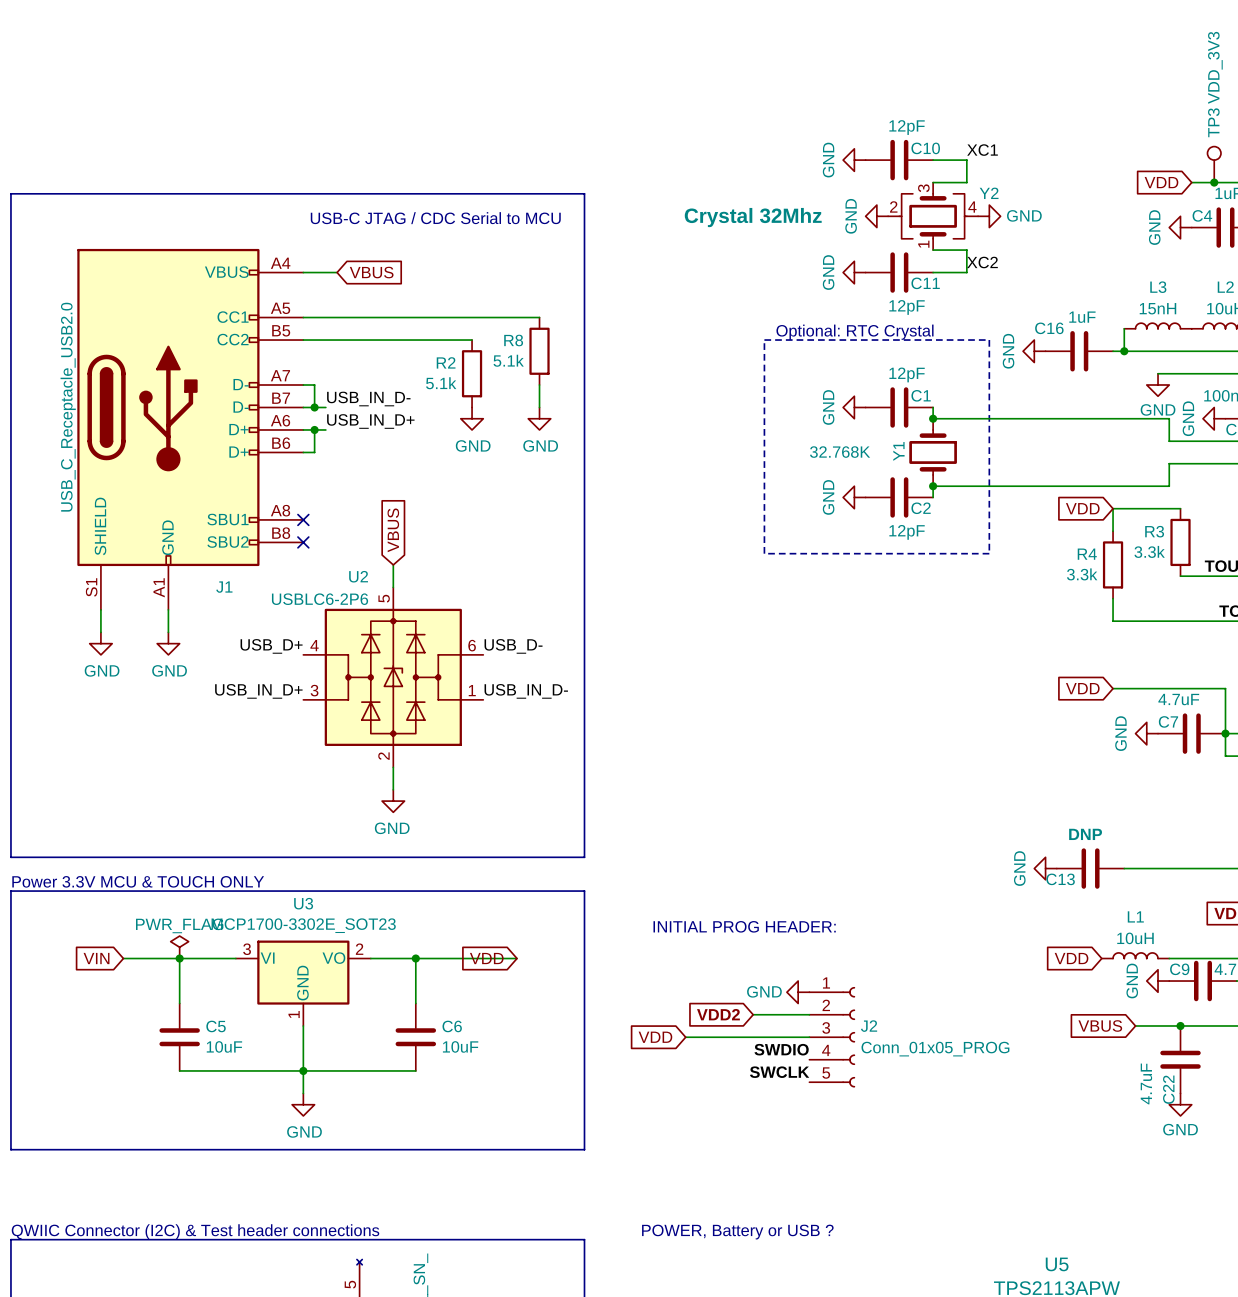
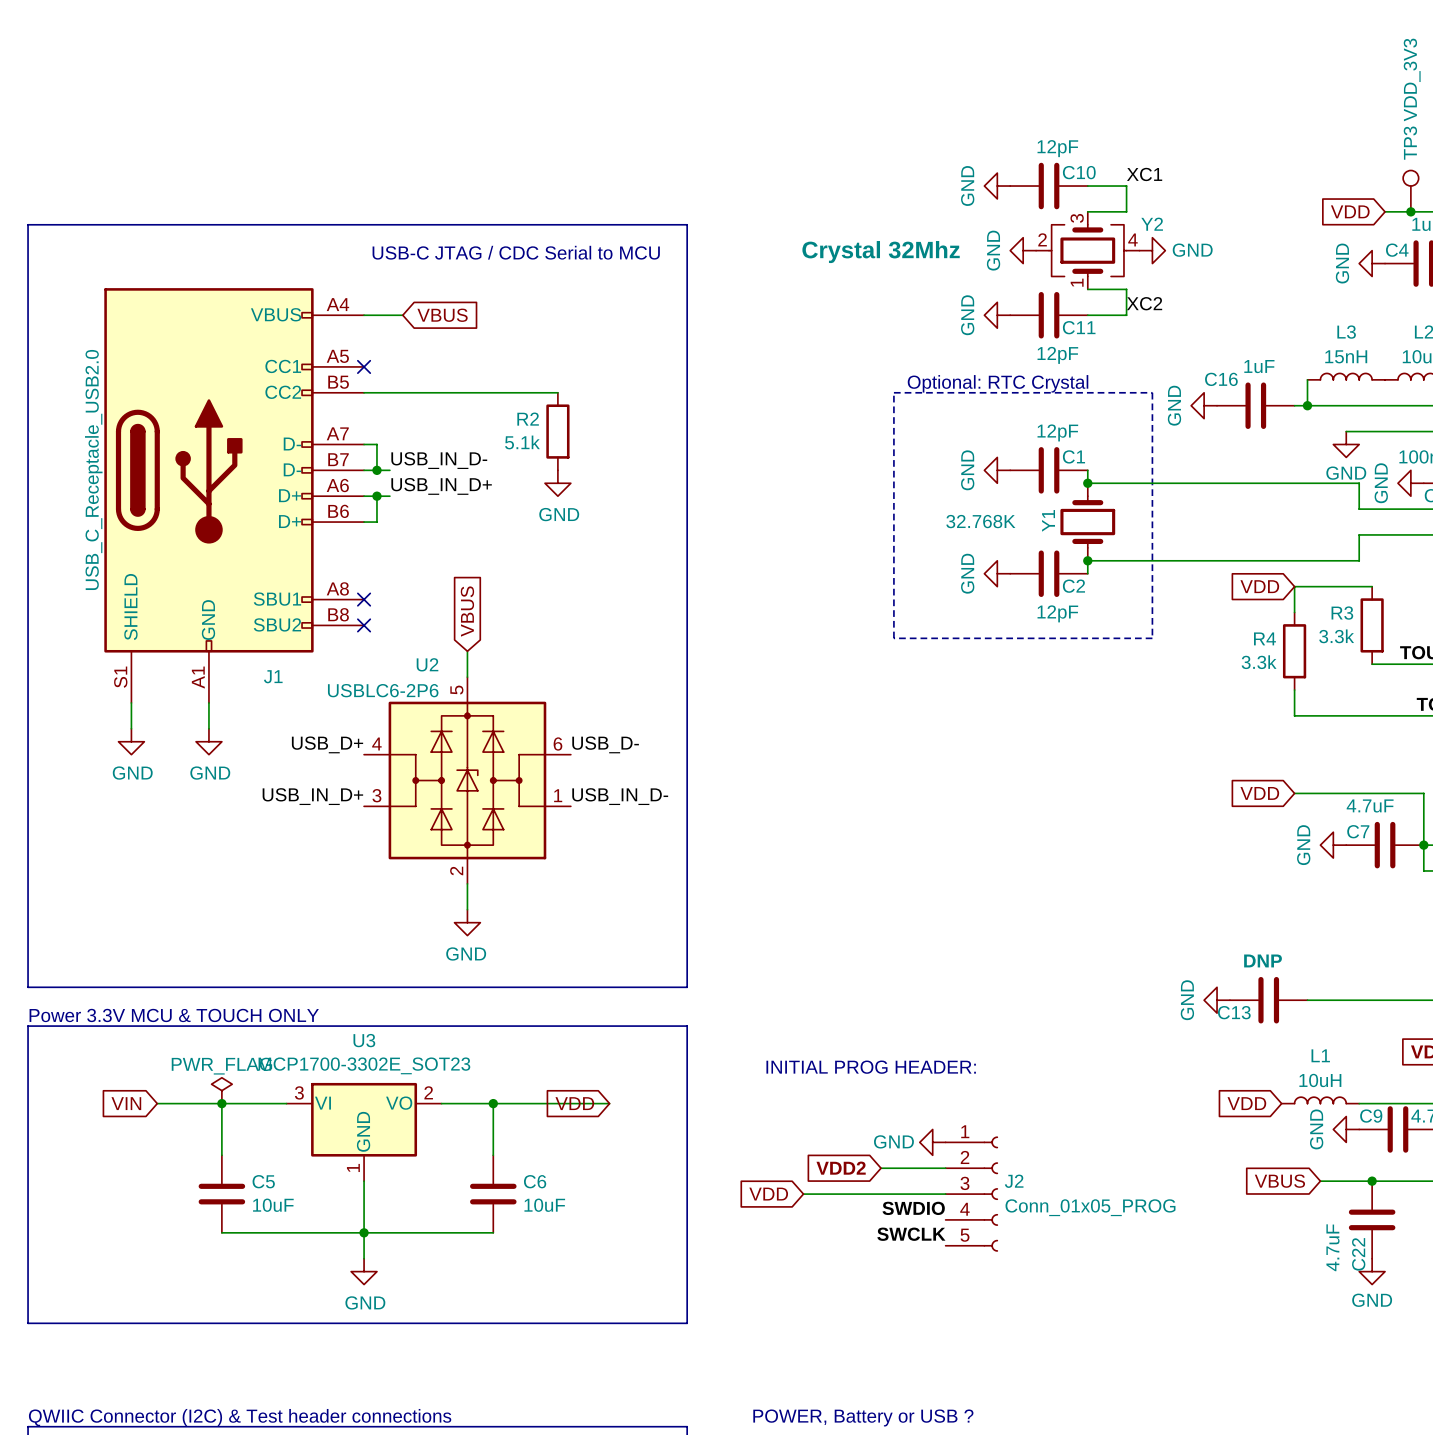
wire: (303, 317) (539, 317) -> none
no-connect mark: none -> (364, 366)
R8: 5.1k (539, 351) -> none
wire: (539, 385) (539, 407) -> none
power symbol: GND (539, 418) -> none

